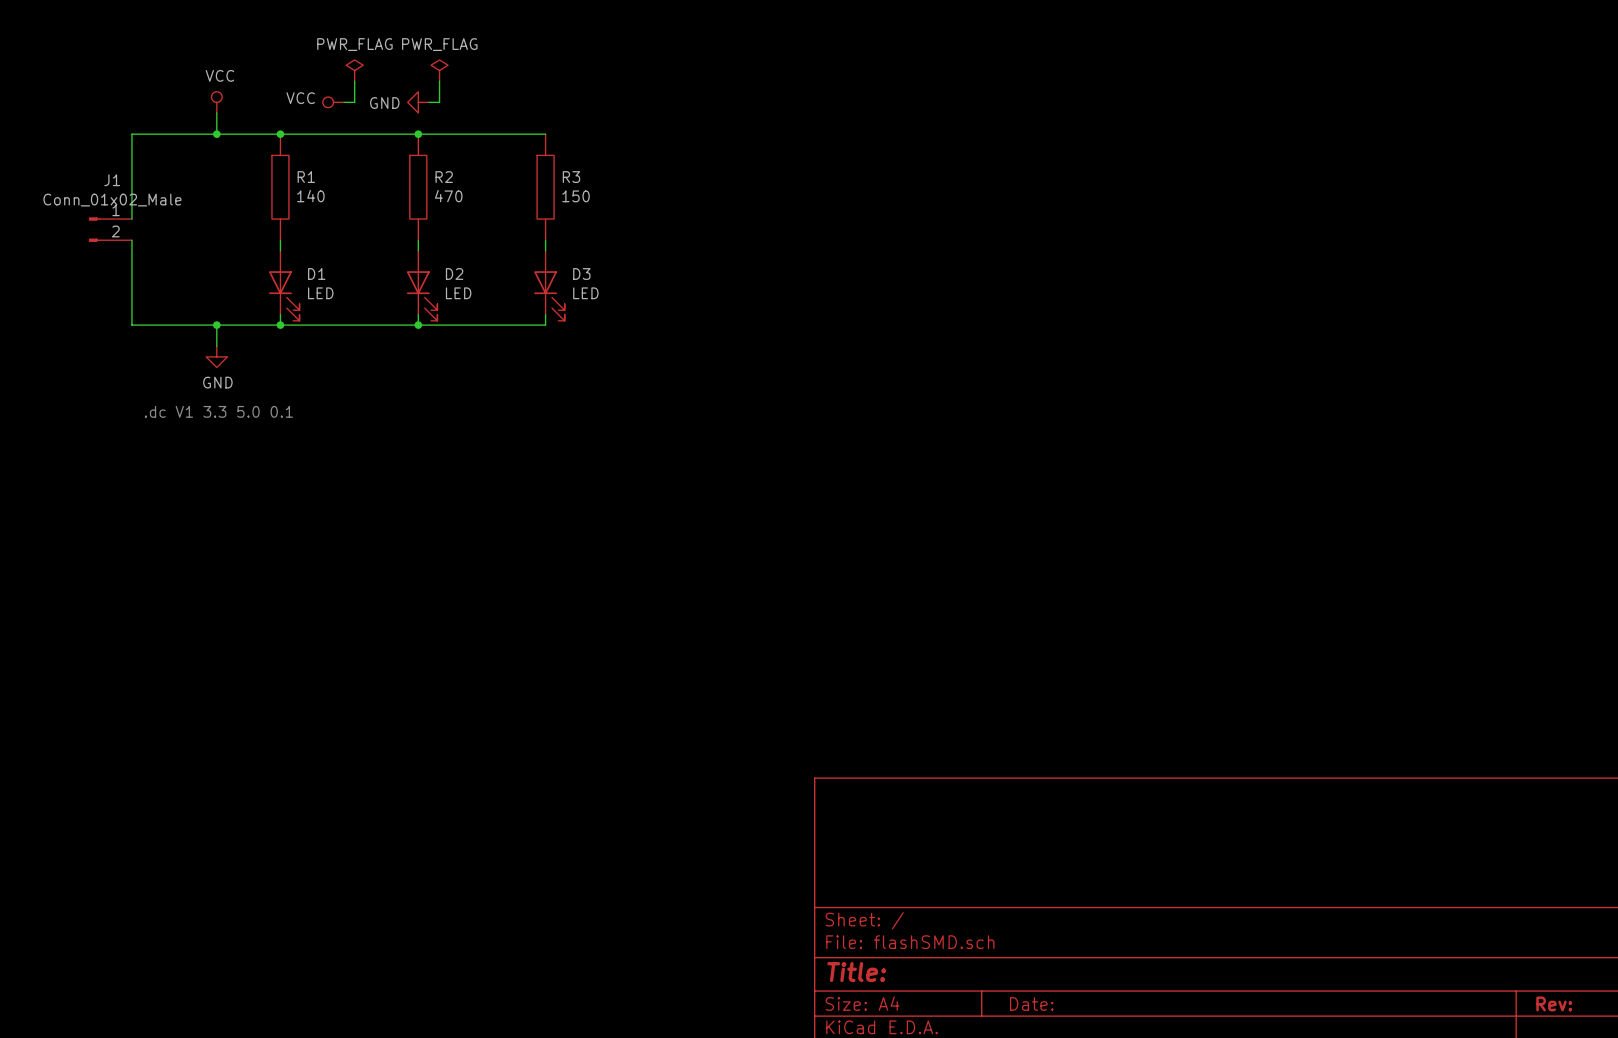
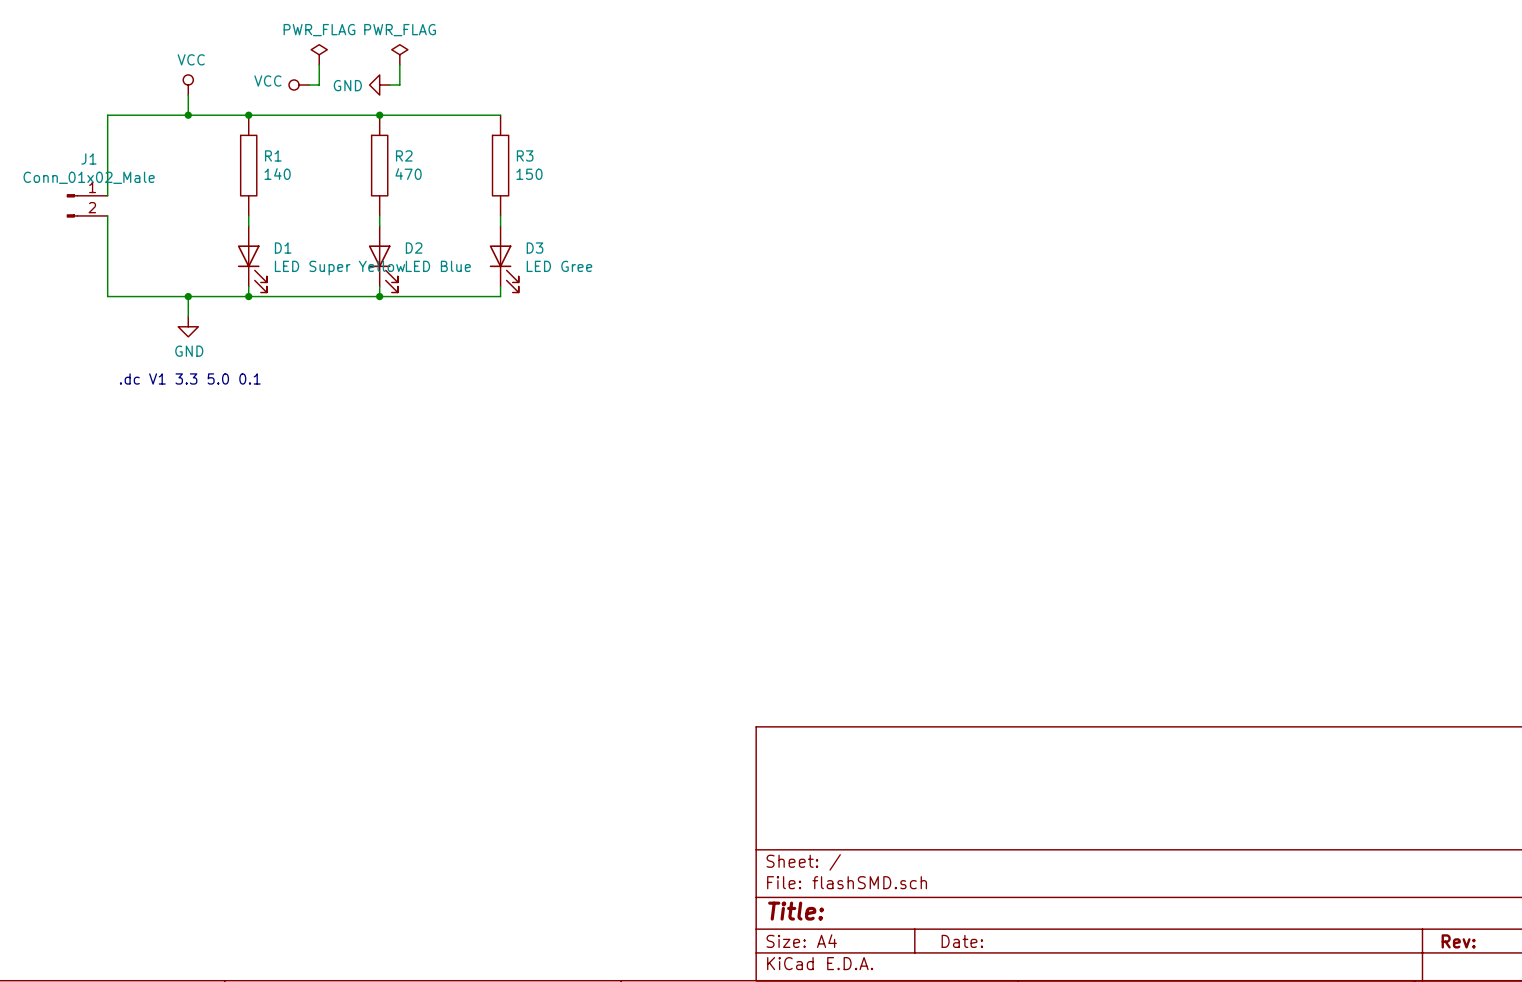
D1 value: LED (320, 293) -> LED Super Yellow (340, 268)
D2 value: LED (458, 293) -> LED Blue (438, 266)
D3 value: LED (585, 293) -> LED Gree (559, 266)

